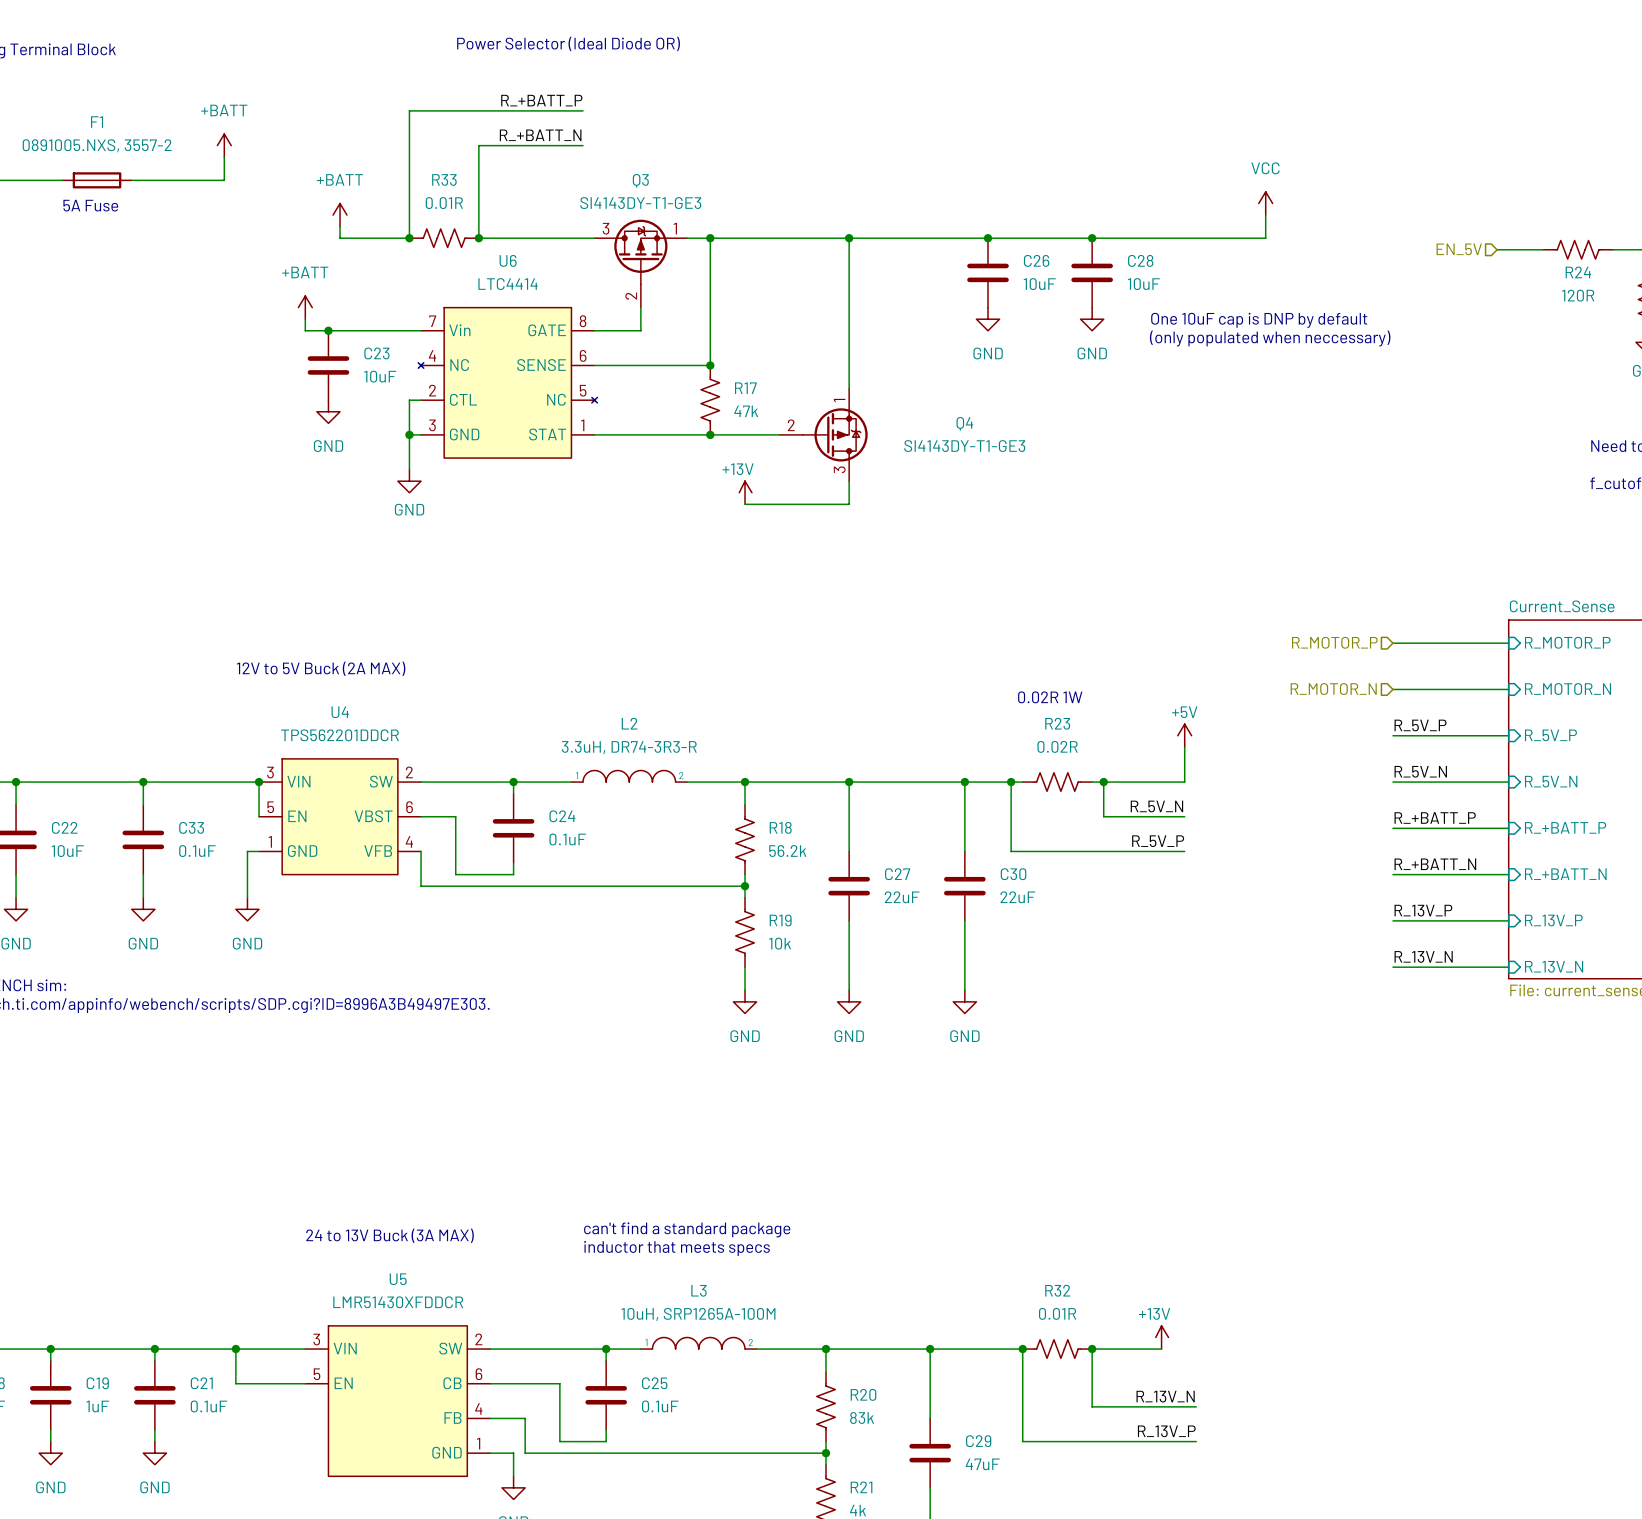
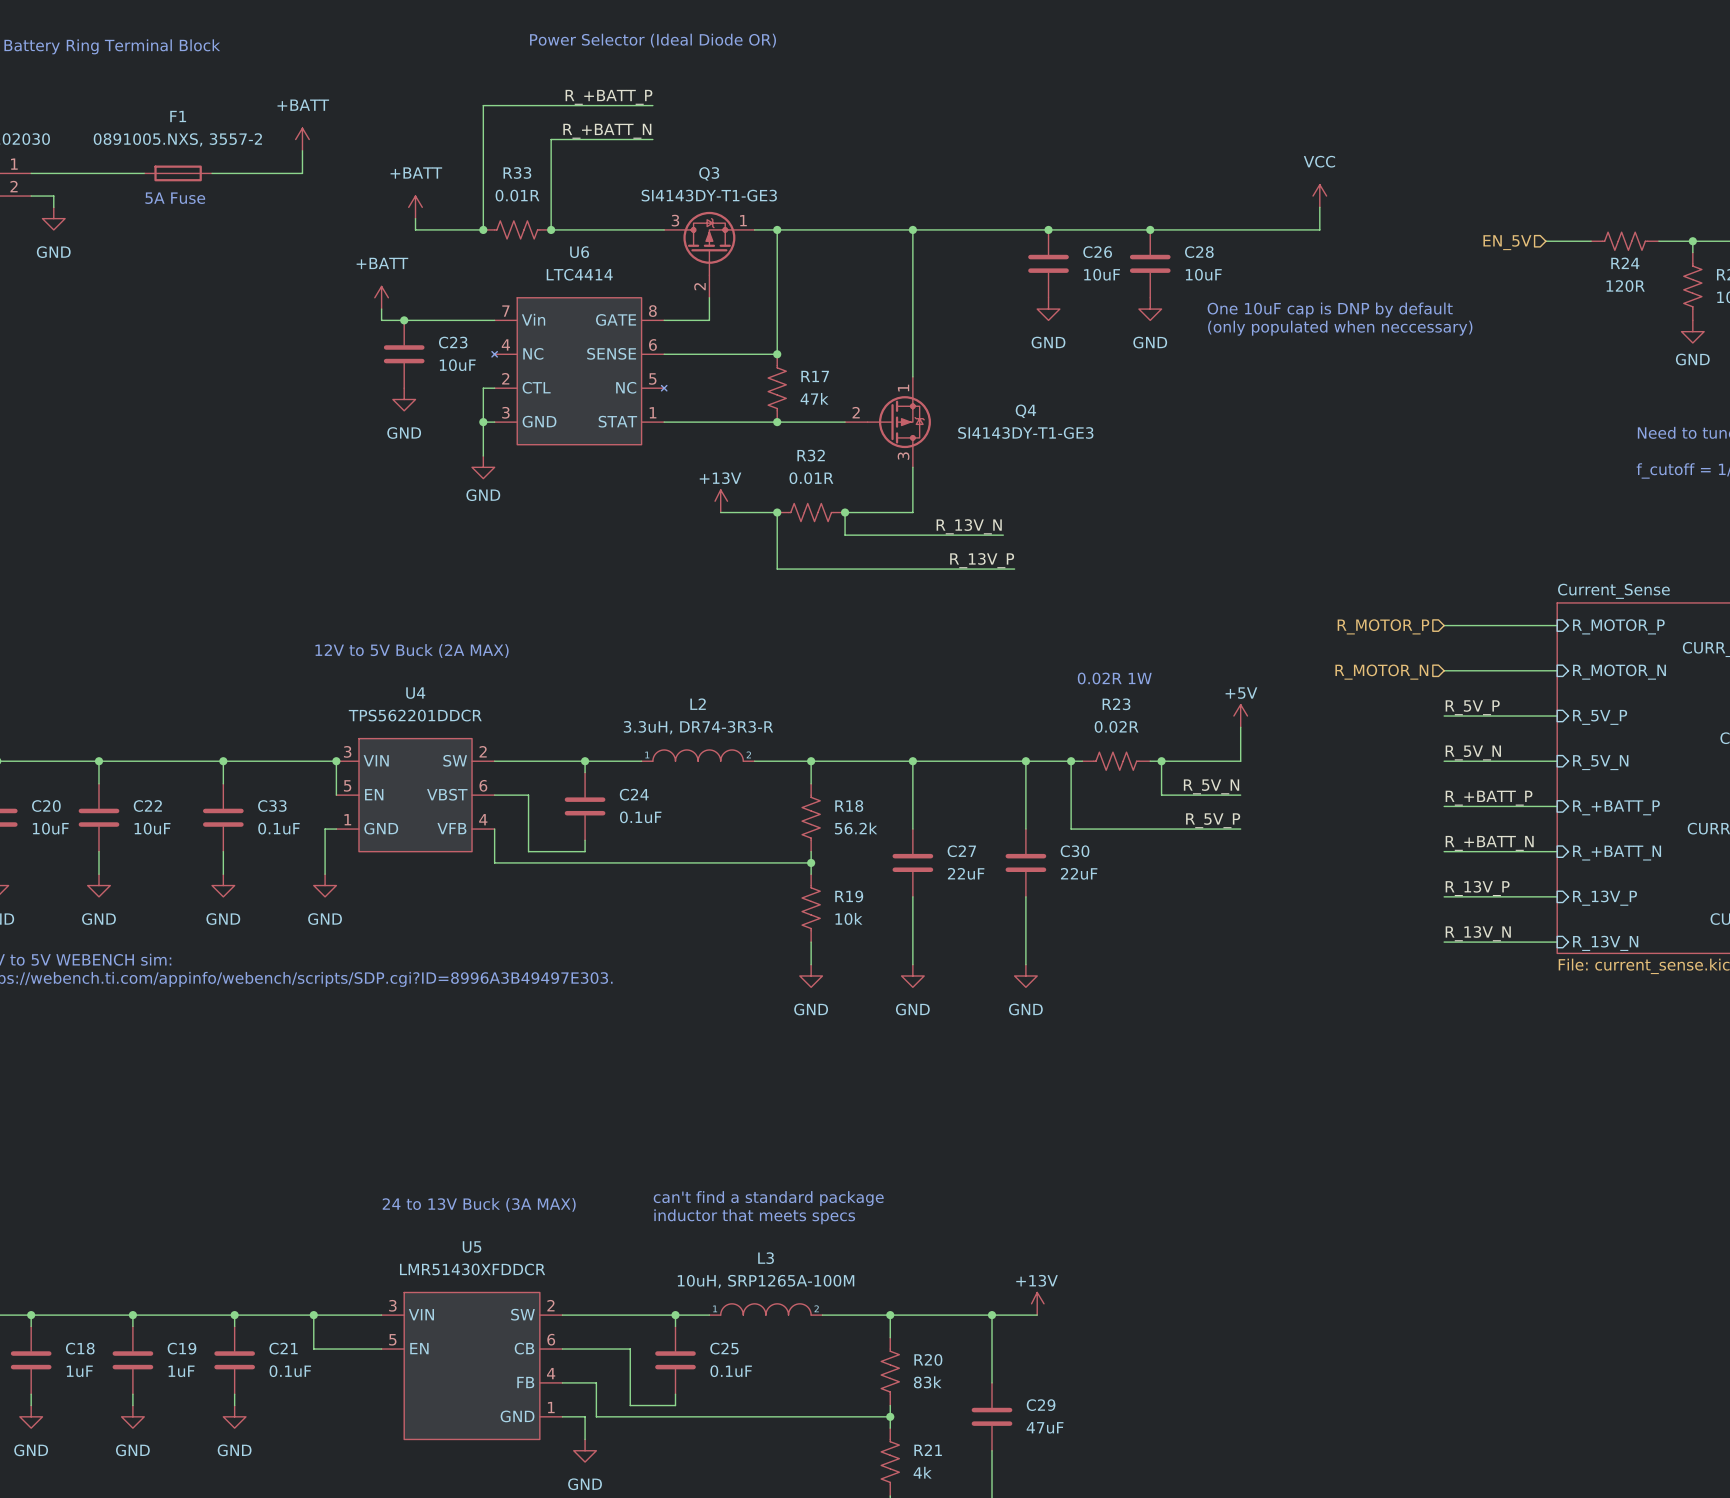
power symbol position: +13V (745, 492) -> +13V (721, 501)
wire: (745, 504) (849, 504) -> (1003, 535) (845, 535) (845, 512) (912, 512) (912, 489)
wire: none -> (720, 512) (777, 512) (777, 569) (1014, 569)
junction: none -> (777, 512)
junction: none -> (845, 512)
label: none -> R_13V_N (969, 526)
label: none -> R_13V_P (982, 560)
power symbol position: +13V (1162, 1337) -> +13V (1037, 1303)
wire: (976, 1349) (1022, 1349) (1022, 1441) (1196, 1441) -> none
junction: (1022, 1349) -> none
R32 position: (1057, 1349) -> (811, 512)
junction: (1092, 1349) -> none
wire: (1161, 1349) (1092, 1349) (1092, 1406) (1196, 1406) -> none
label: R_13V_N (1165, 1396) -> none
label: R_13V_P (1166, 1431) -> none

